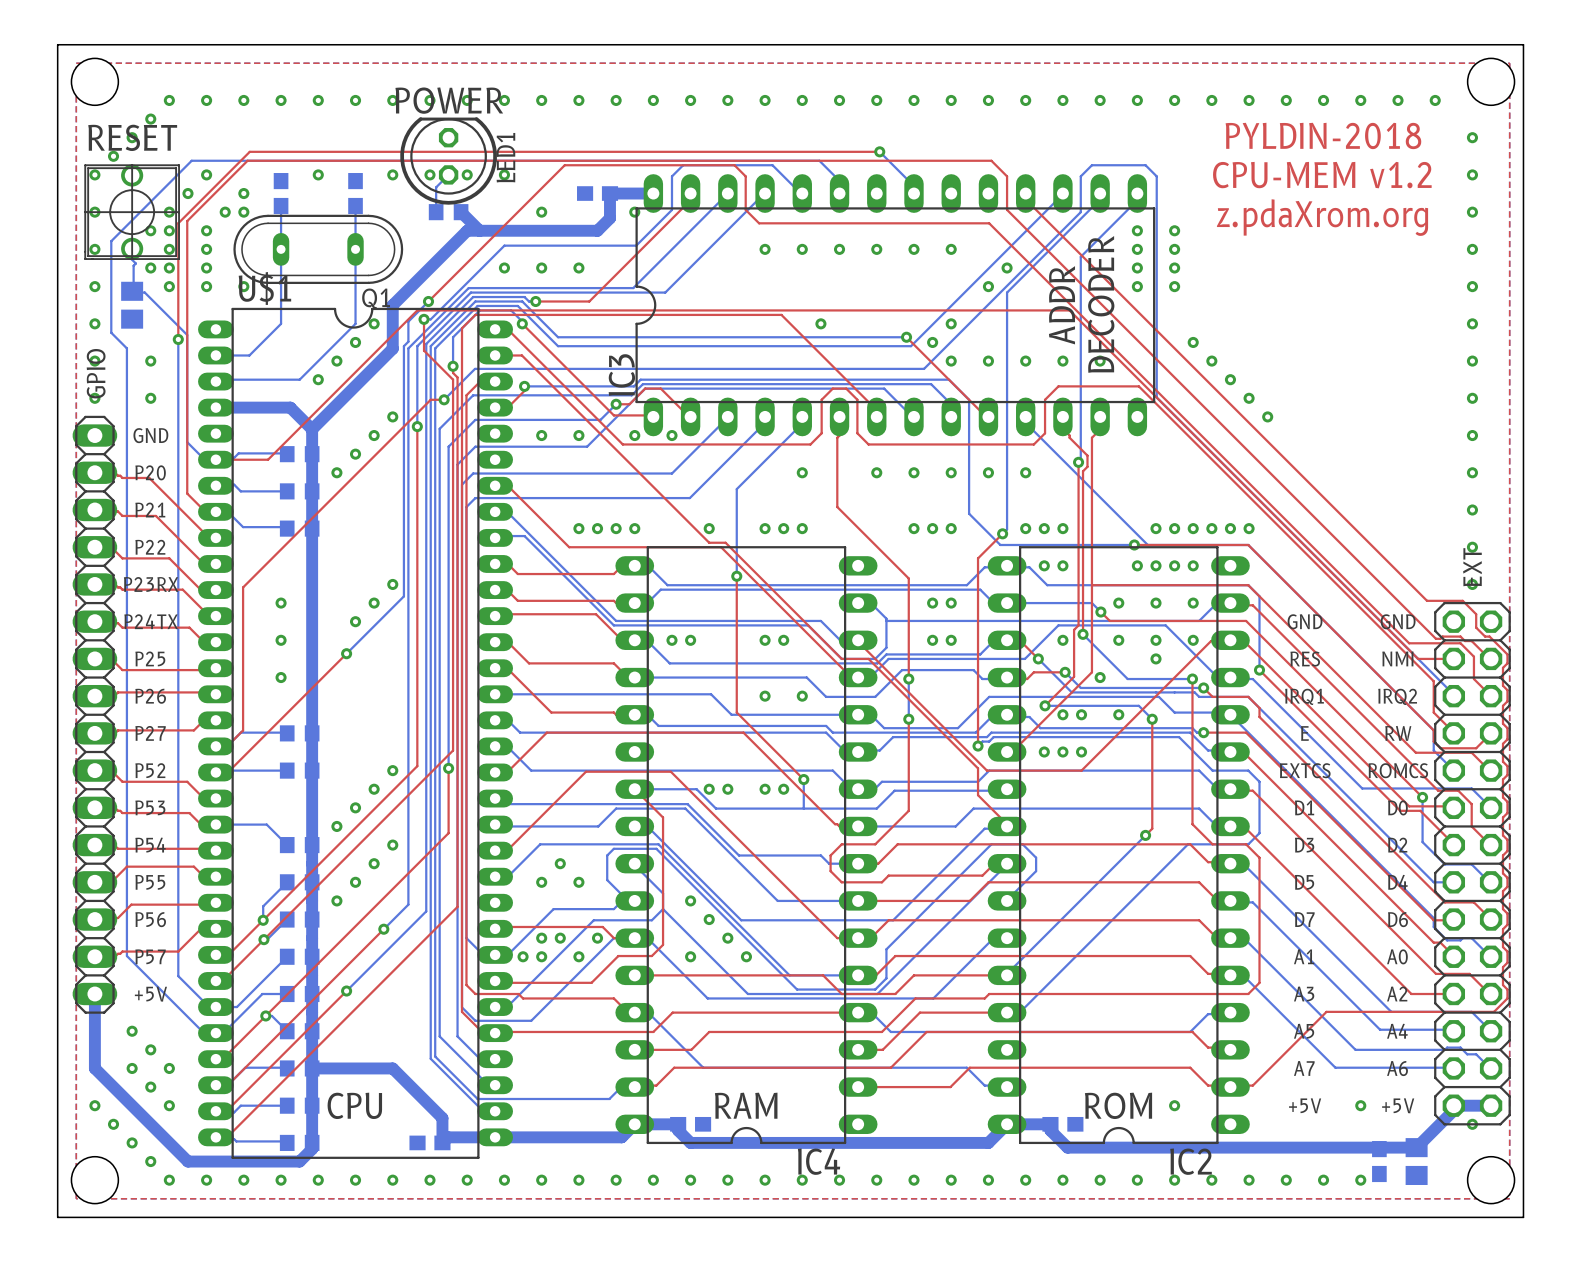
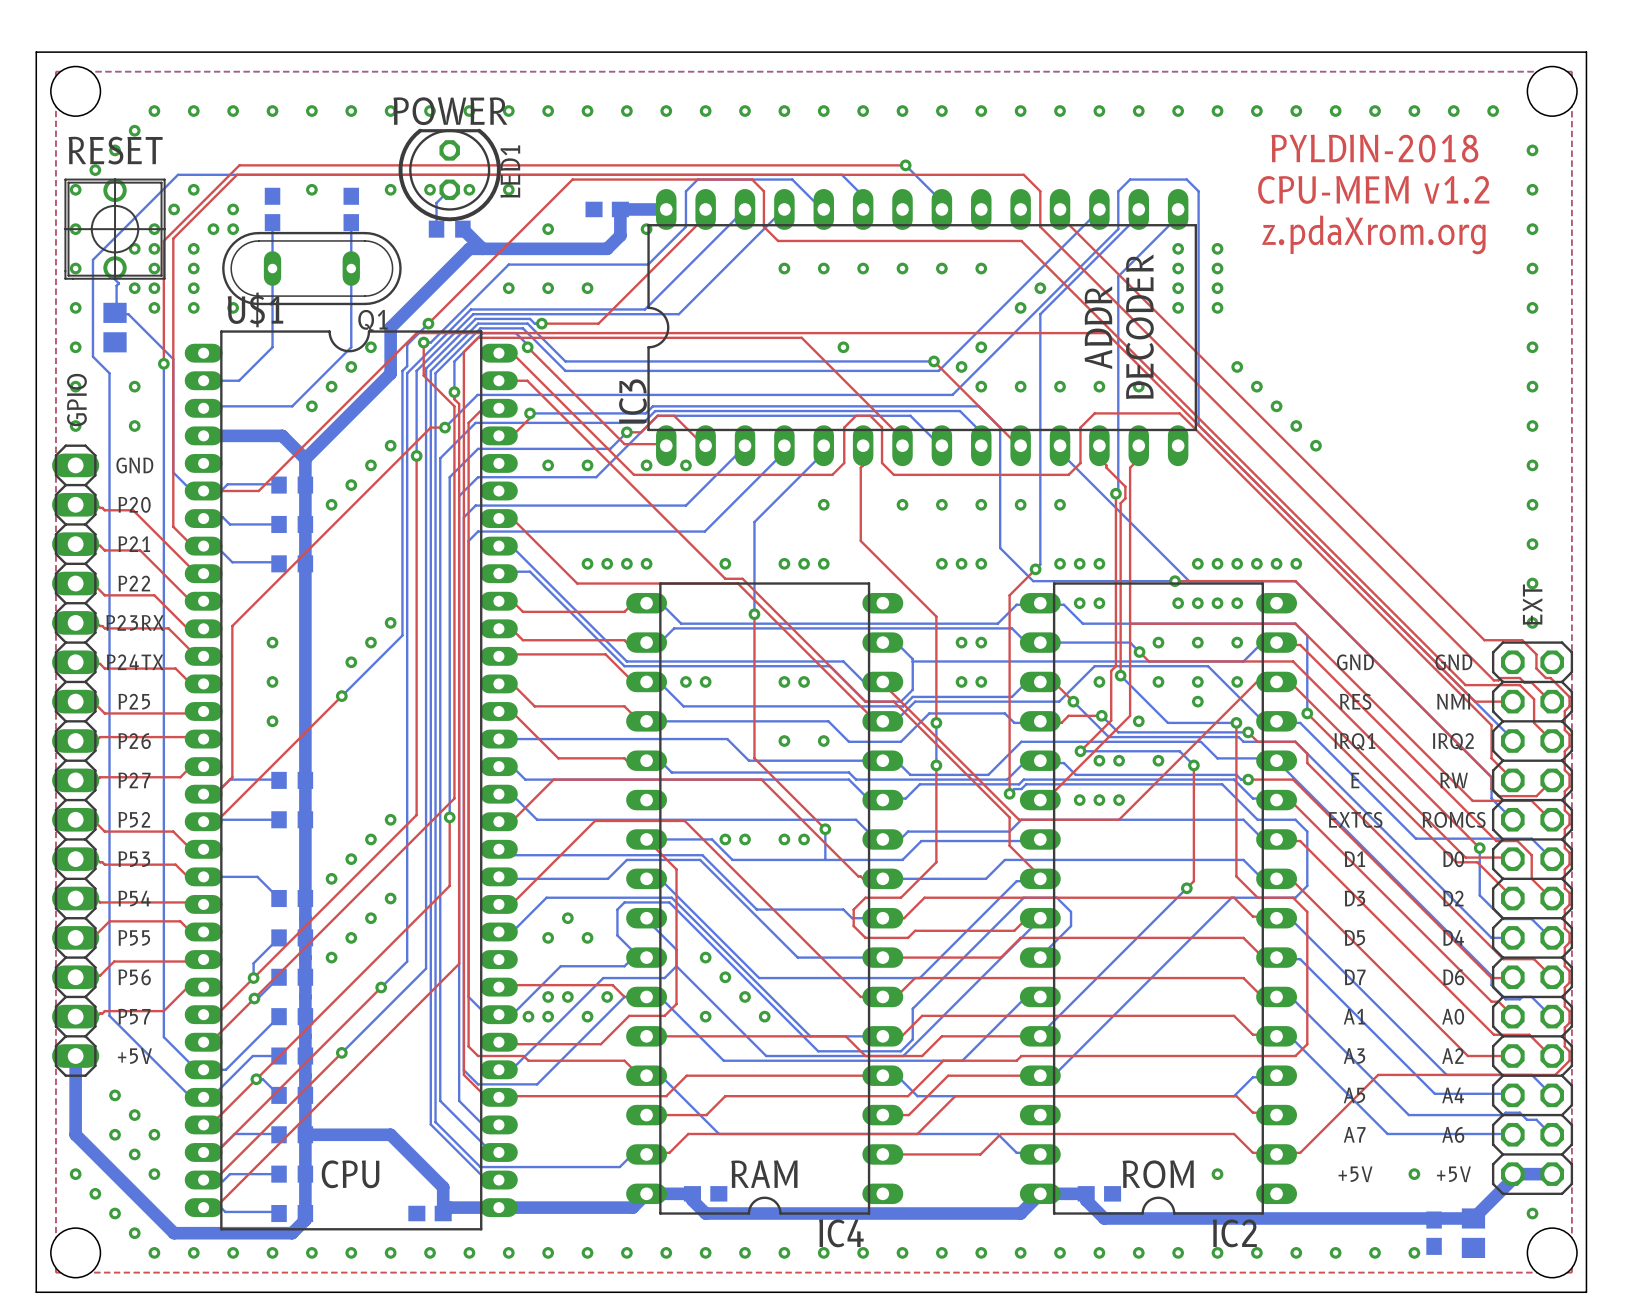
via position: (1472, 1124) -> (1532, 1213)

